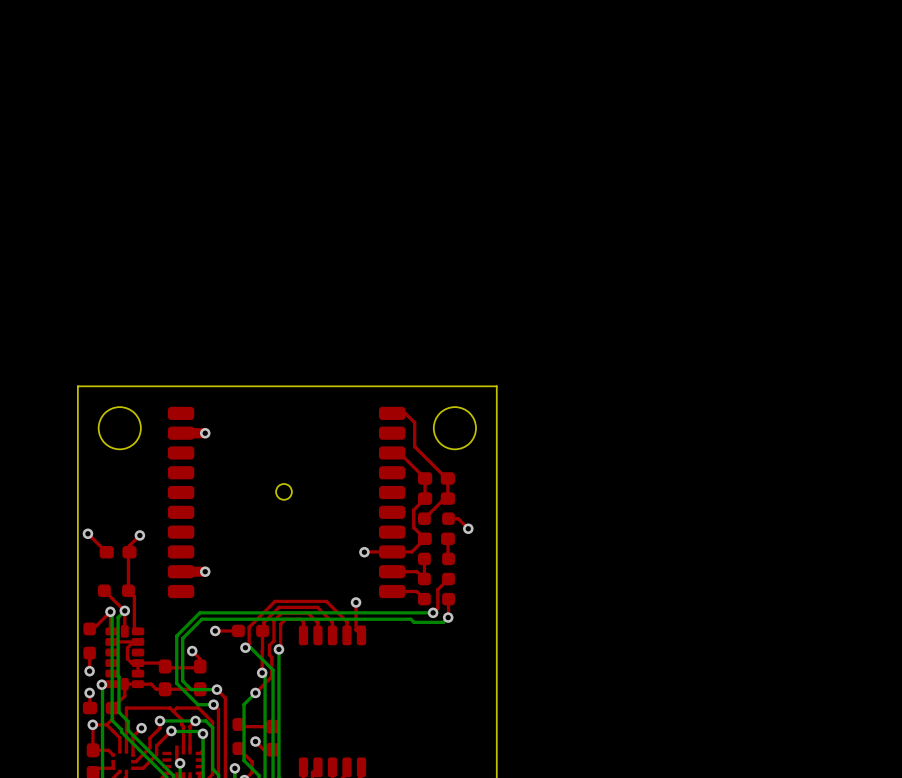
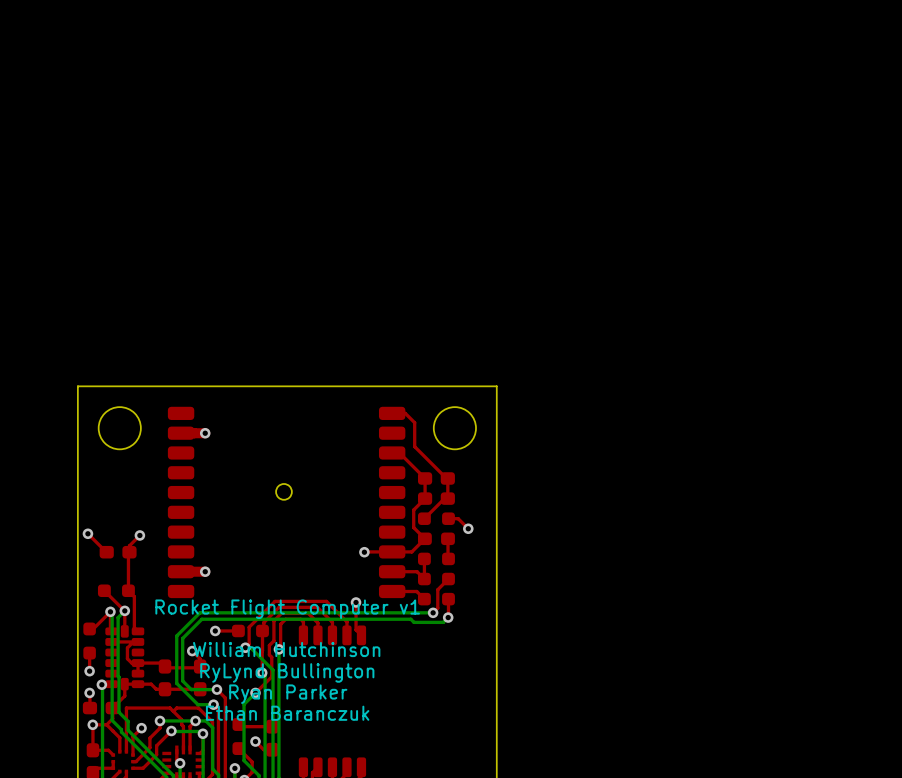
text: none -> Rocket Flight Computer v1 (287, 609)
text: none -> William Hutchinson (286, 649)
text: none -> RyLynd Bullington (287, 672)
text: none -> Ryan Parker (288, 694)
text: none -> Ethan Baranczuk (287, 713)

